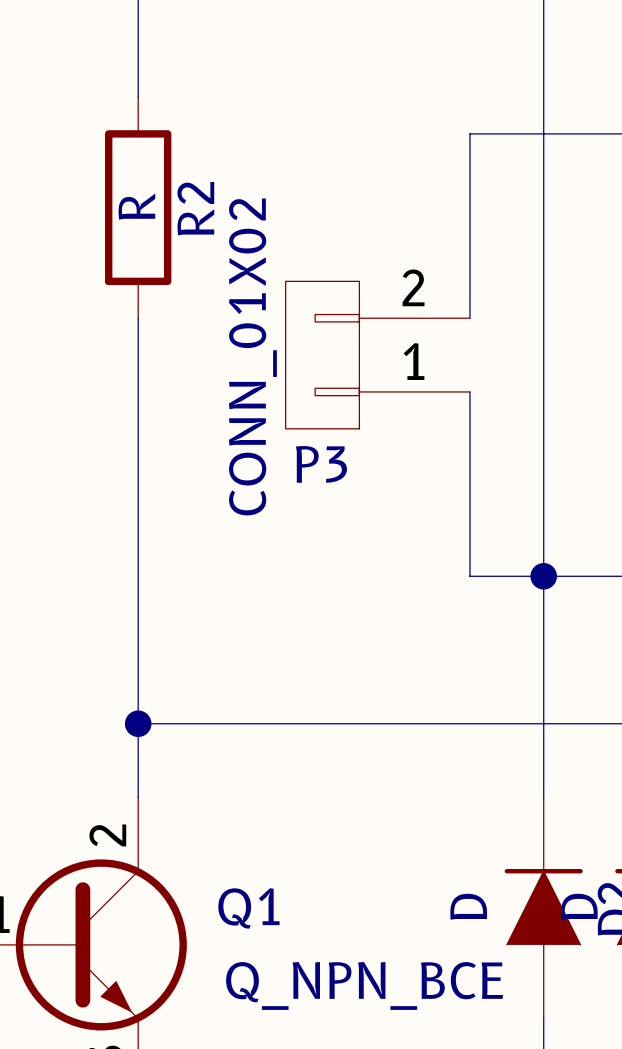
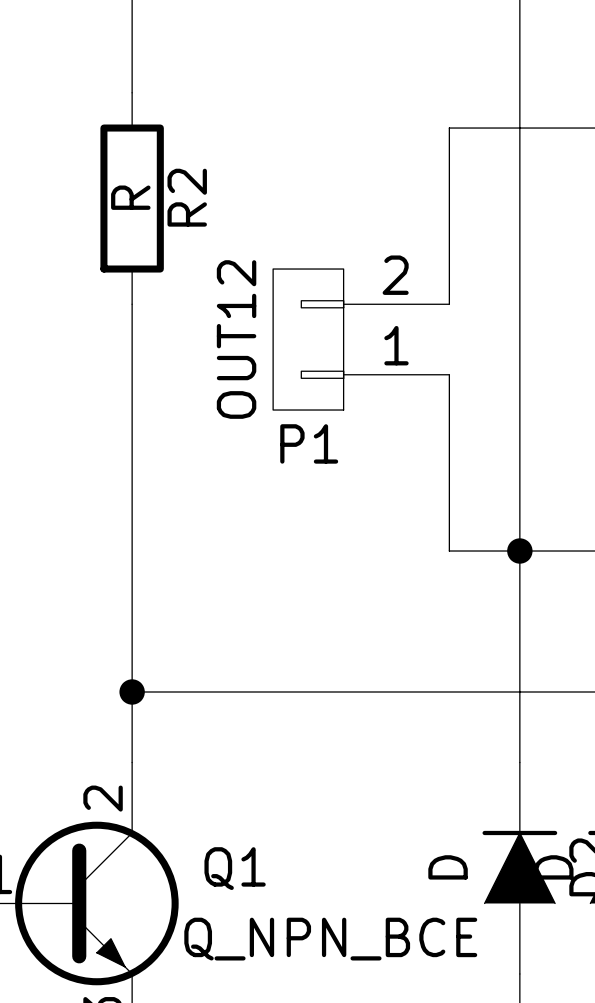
P3 value: CONN_01X02 (252, 356) -> OUT12 (236, 339)
P3 name: P3 (321, 464) -> P1 (309, 443)

